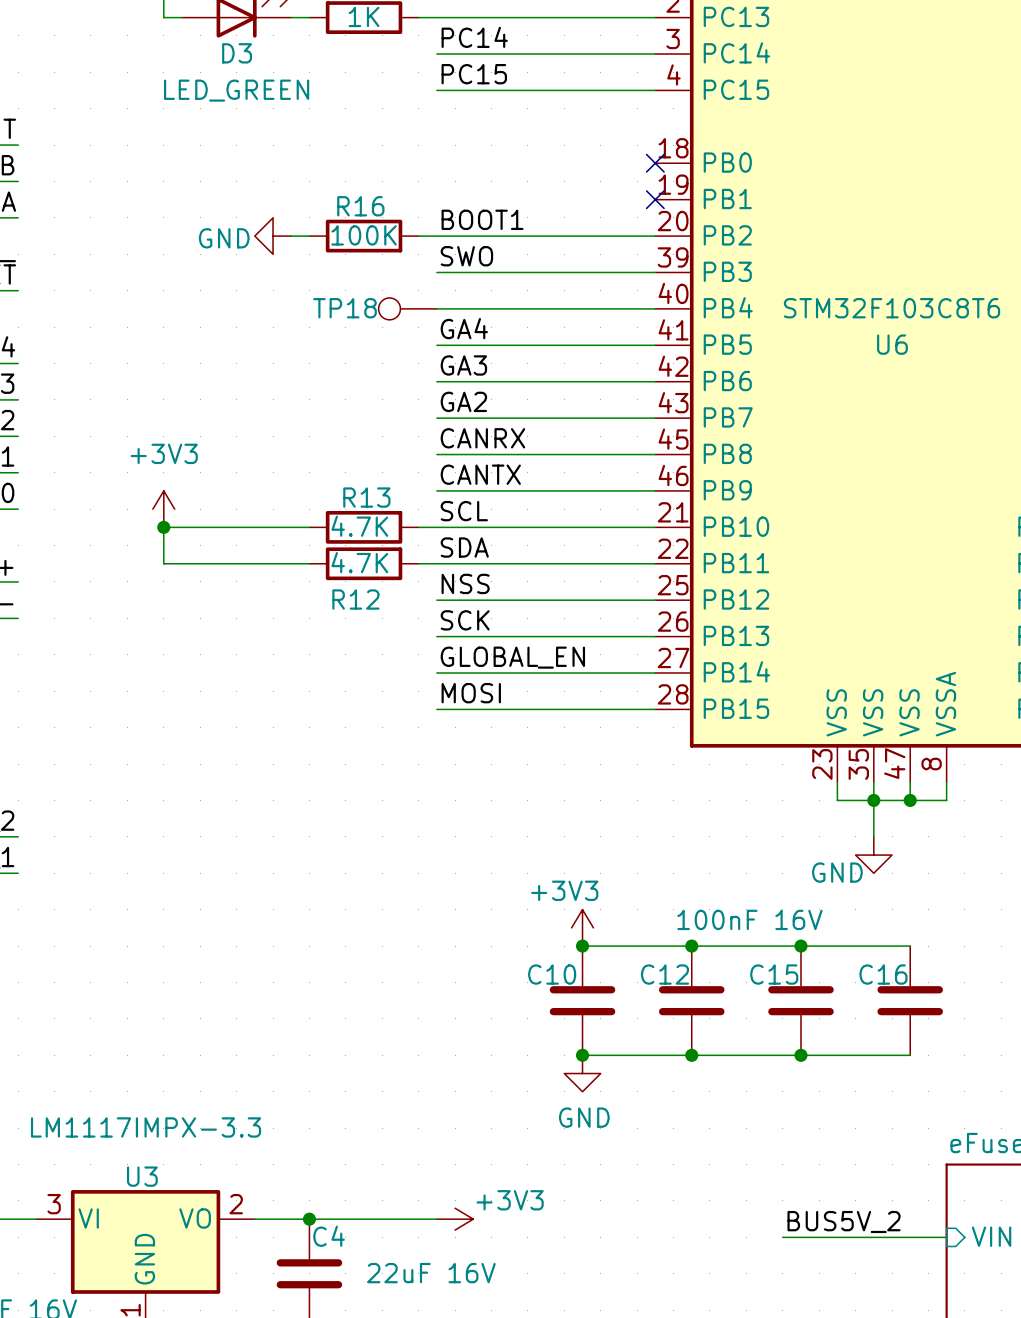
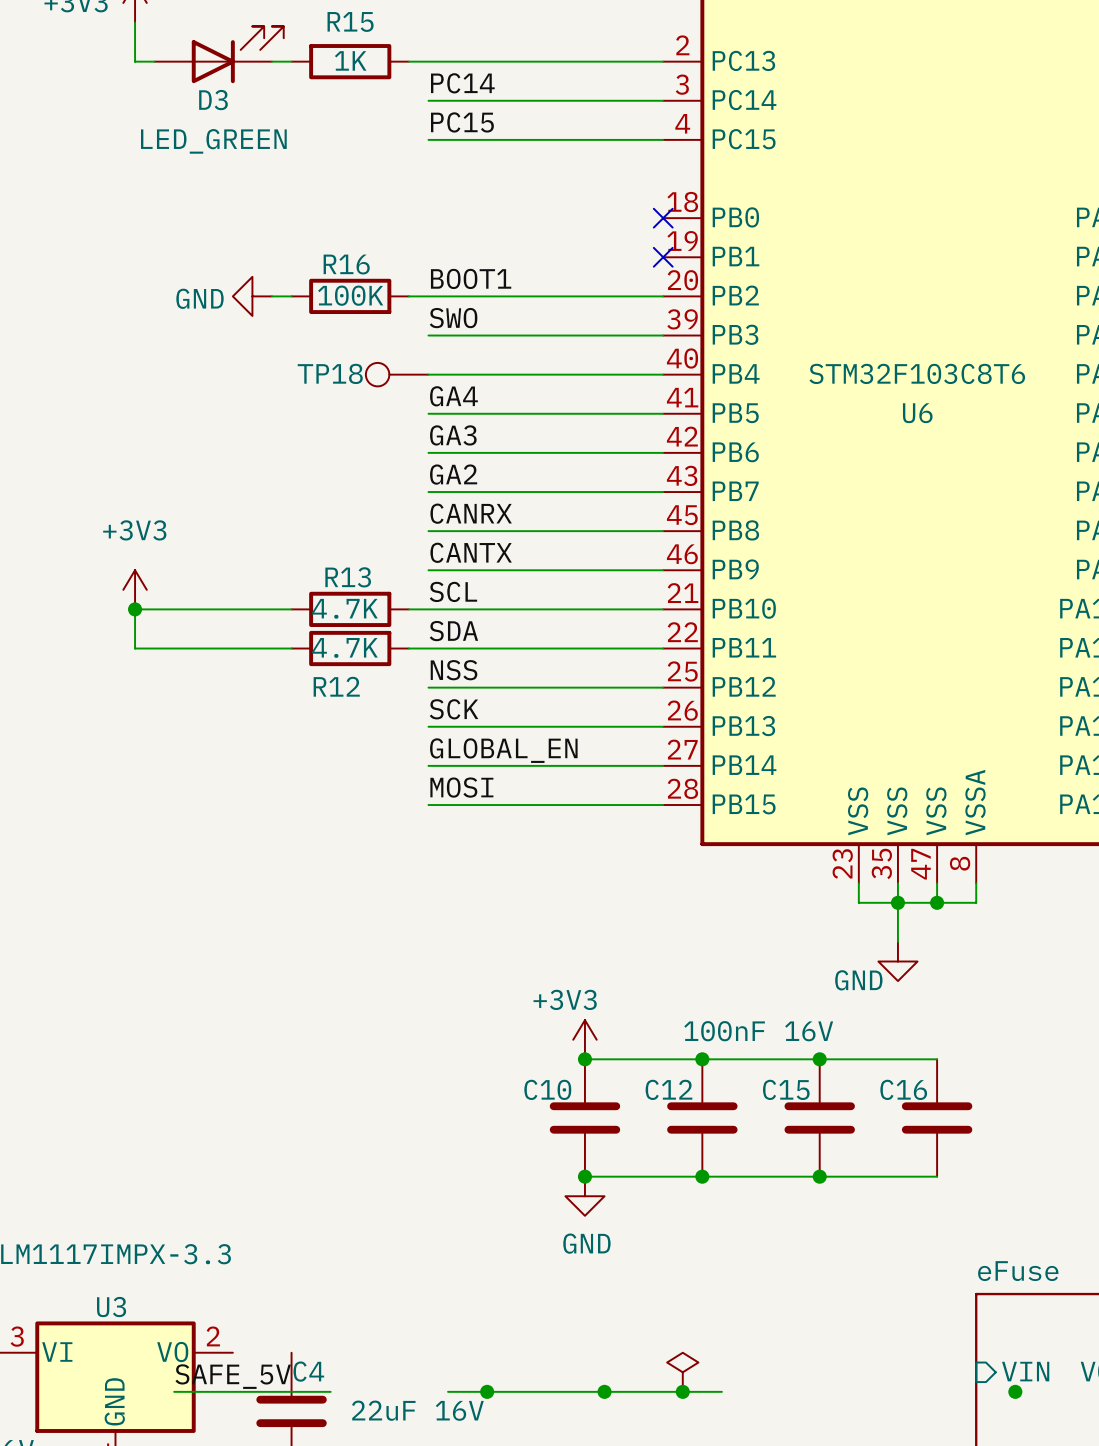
wire: (254, 1219) (436, 1219) -> none
junction: (309, 1219) -> none
power symbol: +3V3 (455, 1219) -> none
label: BUS5V_2 (844, 1222) -> none
power symbol: none -> (682, 1372)
wire: (782, 1237) (946, 1237) -> none
label: none -> SAFE_5V (233, 1376)
wire: none -> (174, 1391) (330, 1391)
wire: none -> (448, 1391) (721, 1391)
junction: none -> (487, 1391)
junction: none -> (604, 1391)
junction: none -> (682, 1391)
junction: none -> (1015, 1391)

